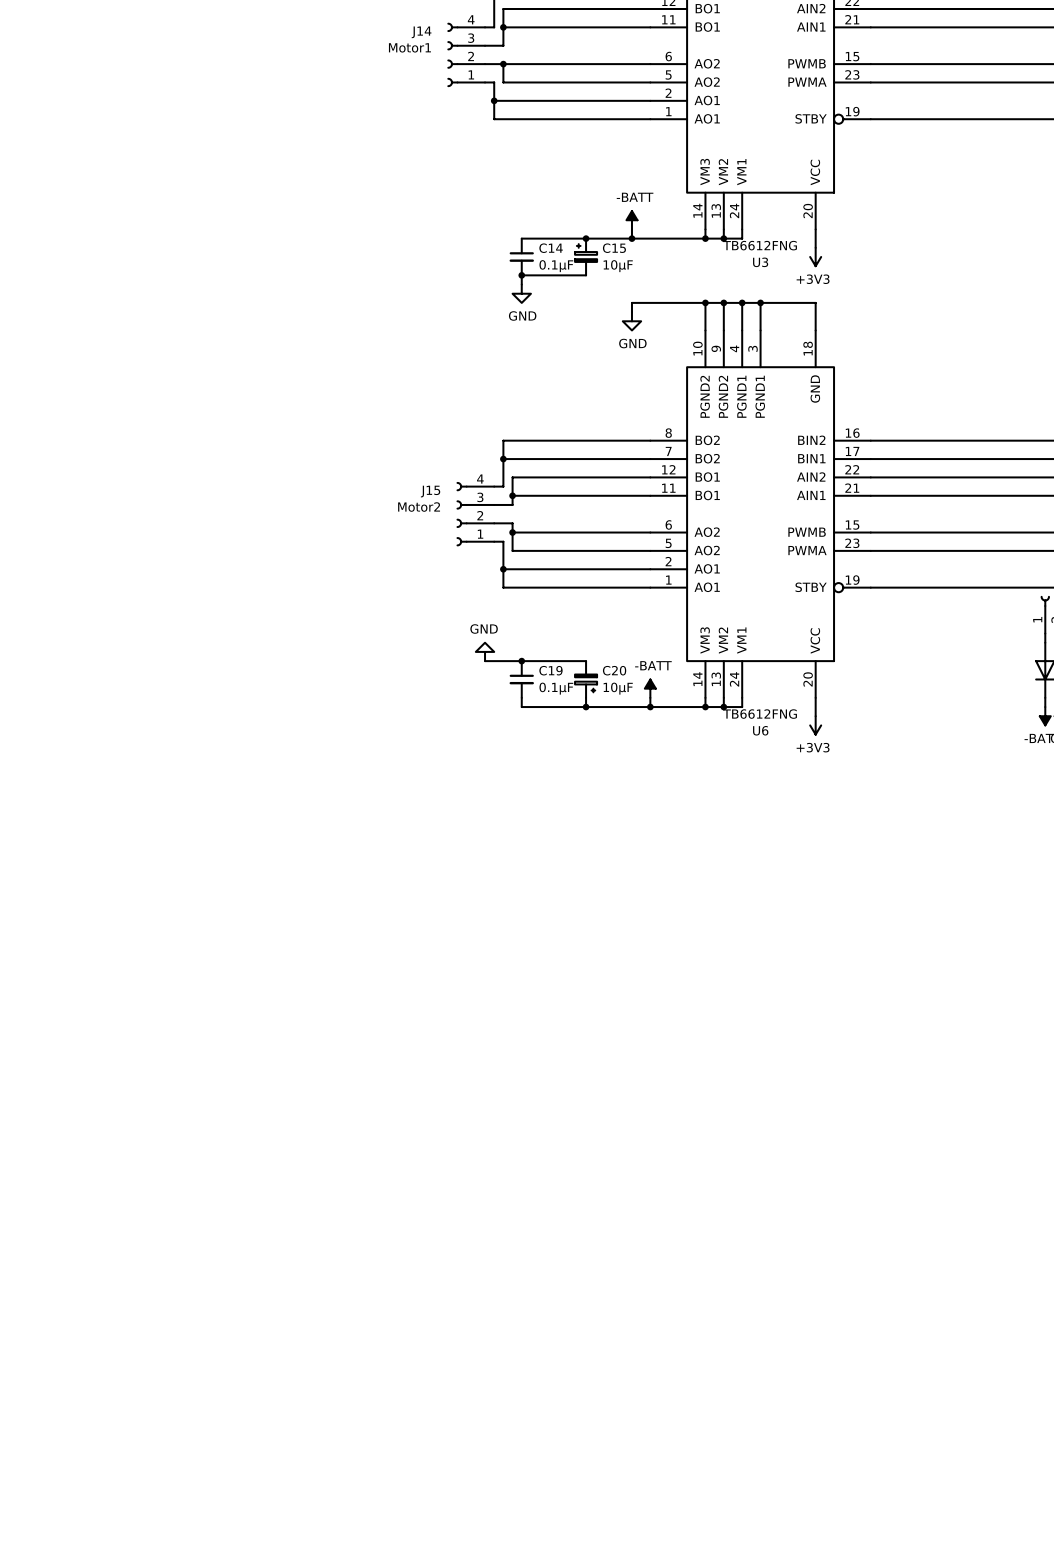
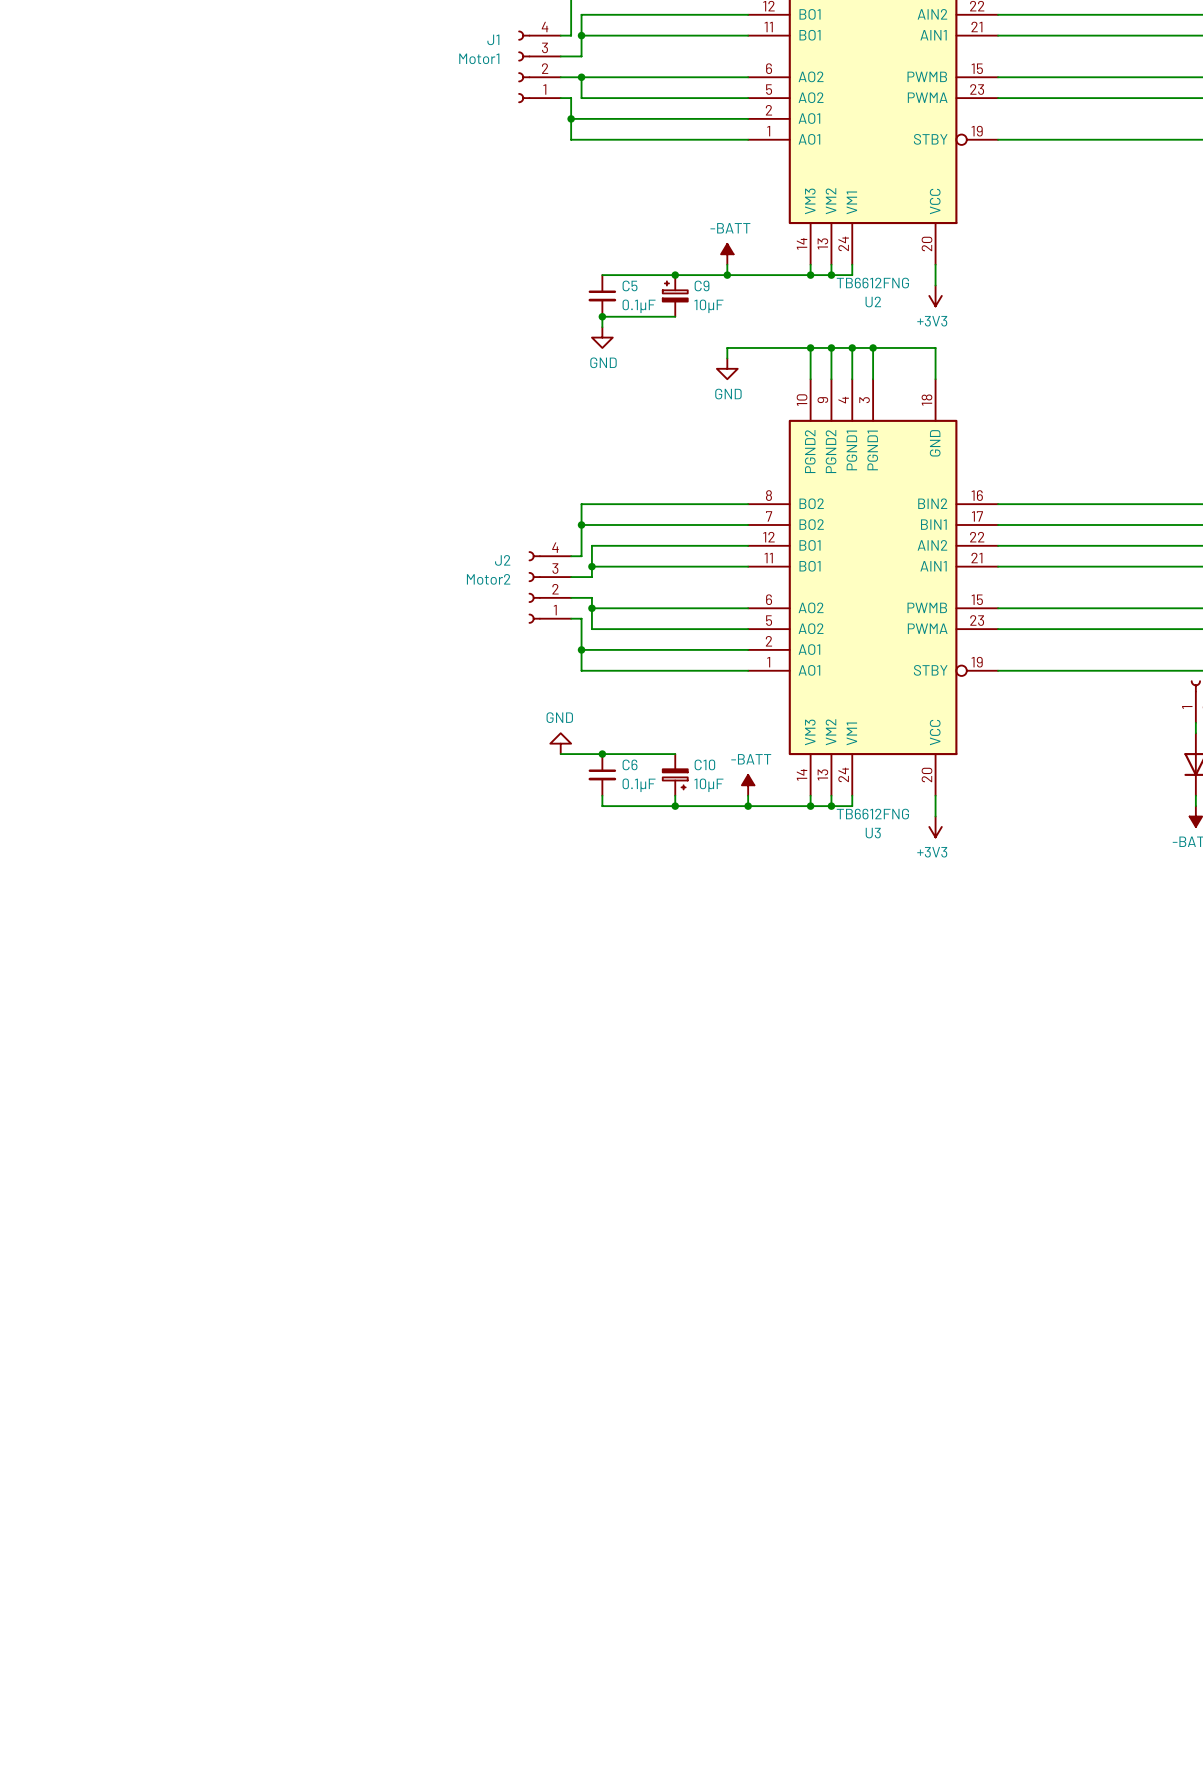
J14 name: J14 (421, 32) -> J1 (493, 39)
C14 name: C14 (551, 248) -> C5 (630, 285)
C15 name: C15 (614, 248) -> C9 (702, 285)
U3 name: U3 (760, 262) -> U2 (873, 301)
J15 name: J15 (430, 491) -> J2 (502, 560)
C19 name: C19 (550, 670) -> C6 (630, 764)
C20 name: C20 (614, 670) -> C10 (704, 764)
U6 name: U6 (760, 730) -> U3 (873, 833)

